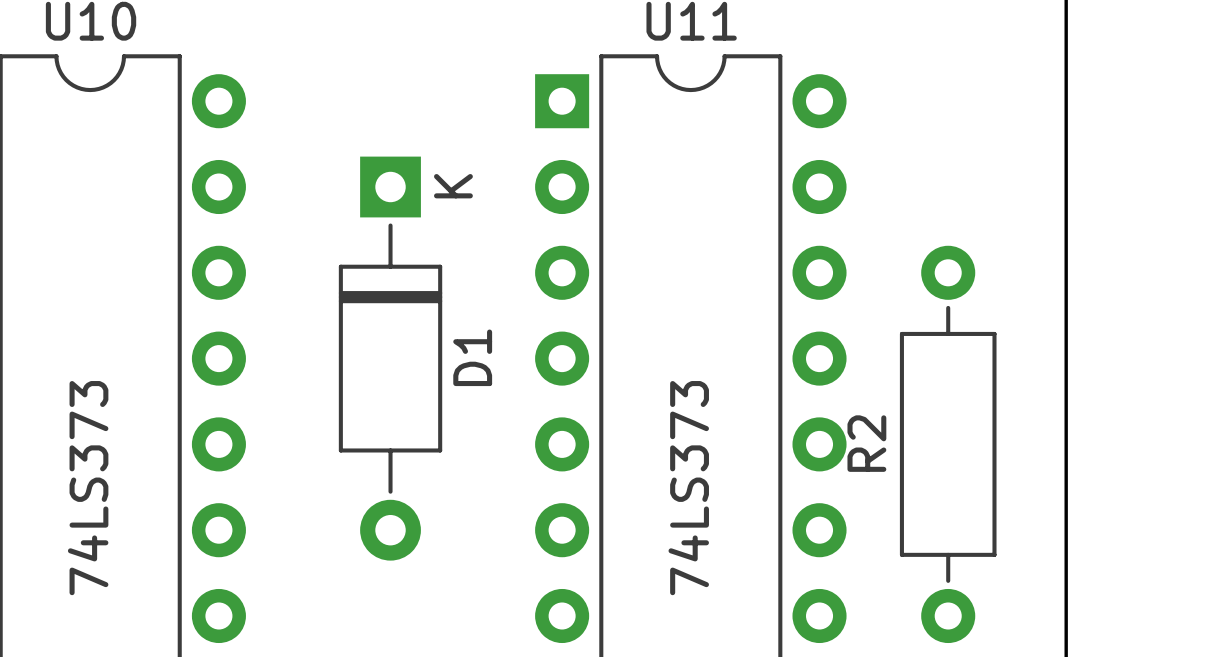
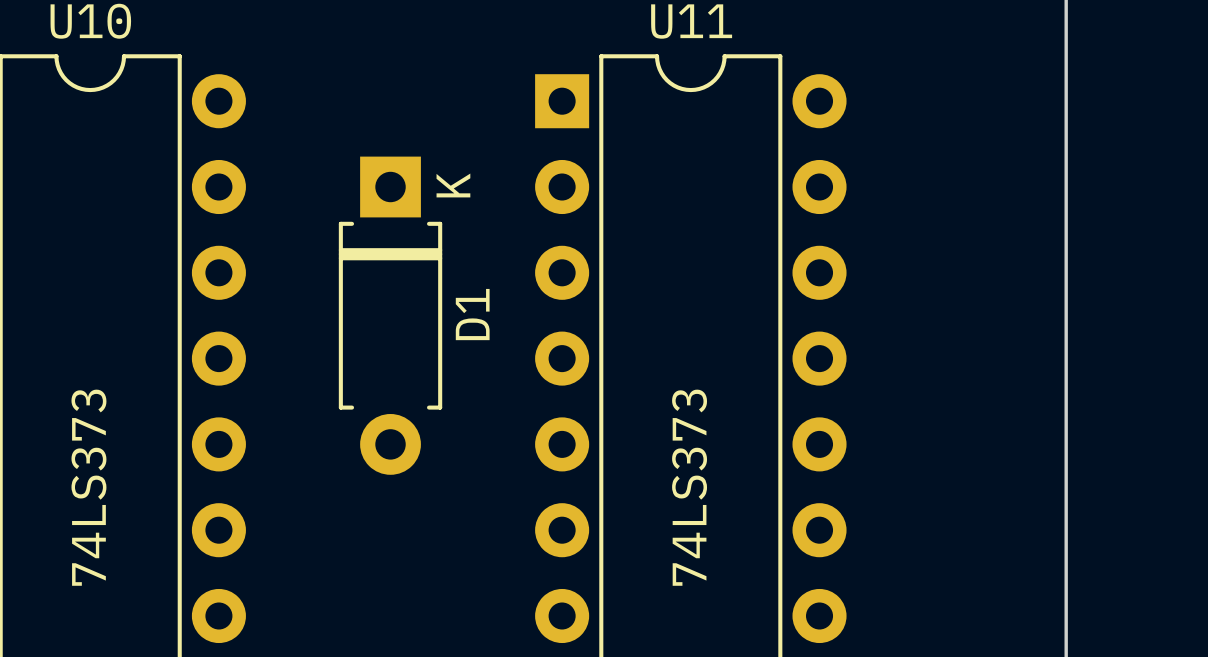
D1 footprint: [338, 156, 443, 561] -> [338, 156, 443, 475]
R2: (948, 444) -> none

